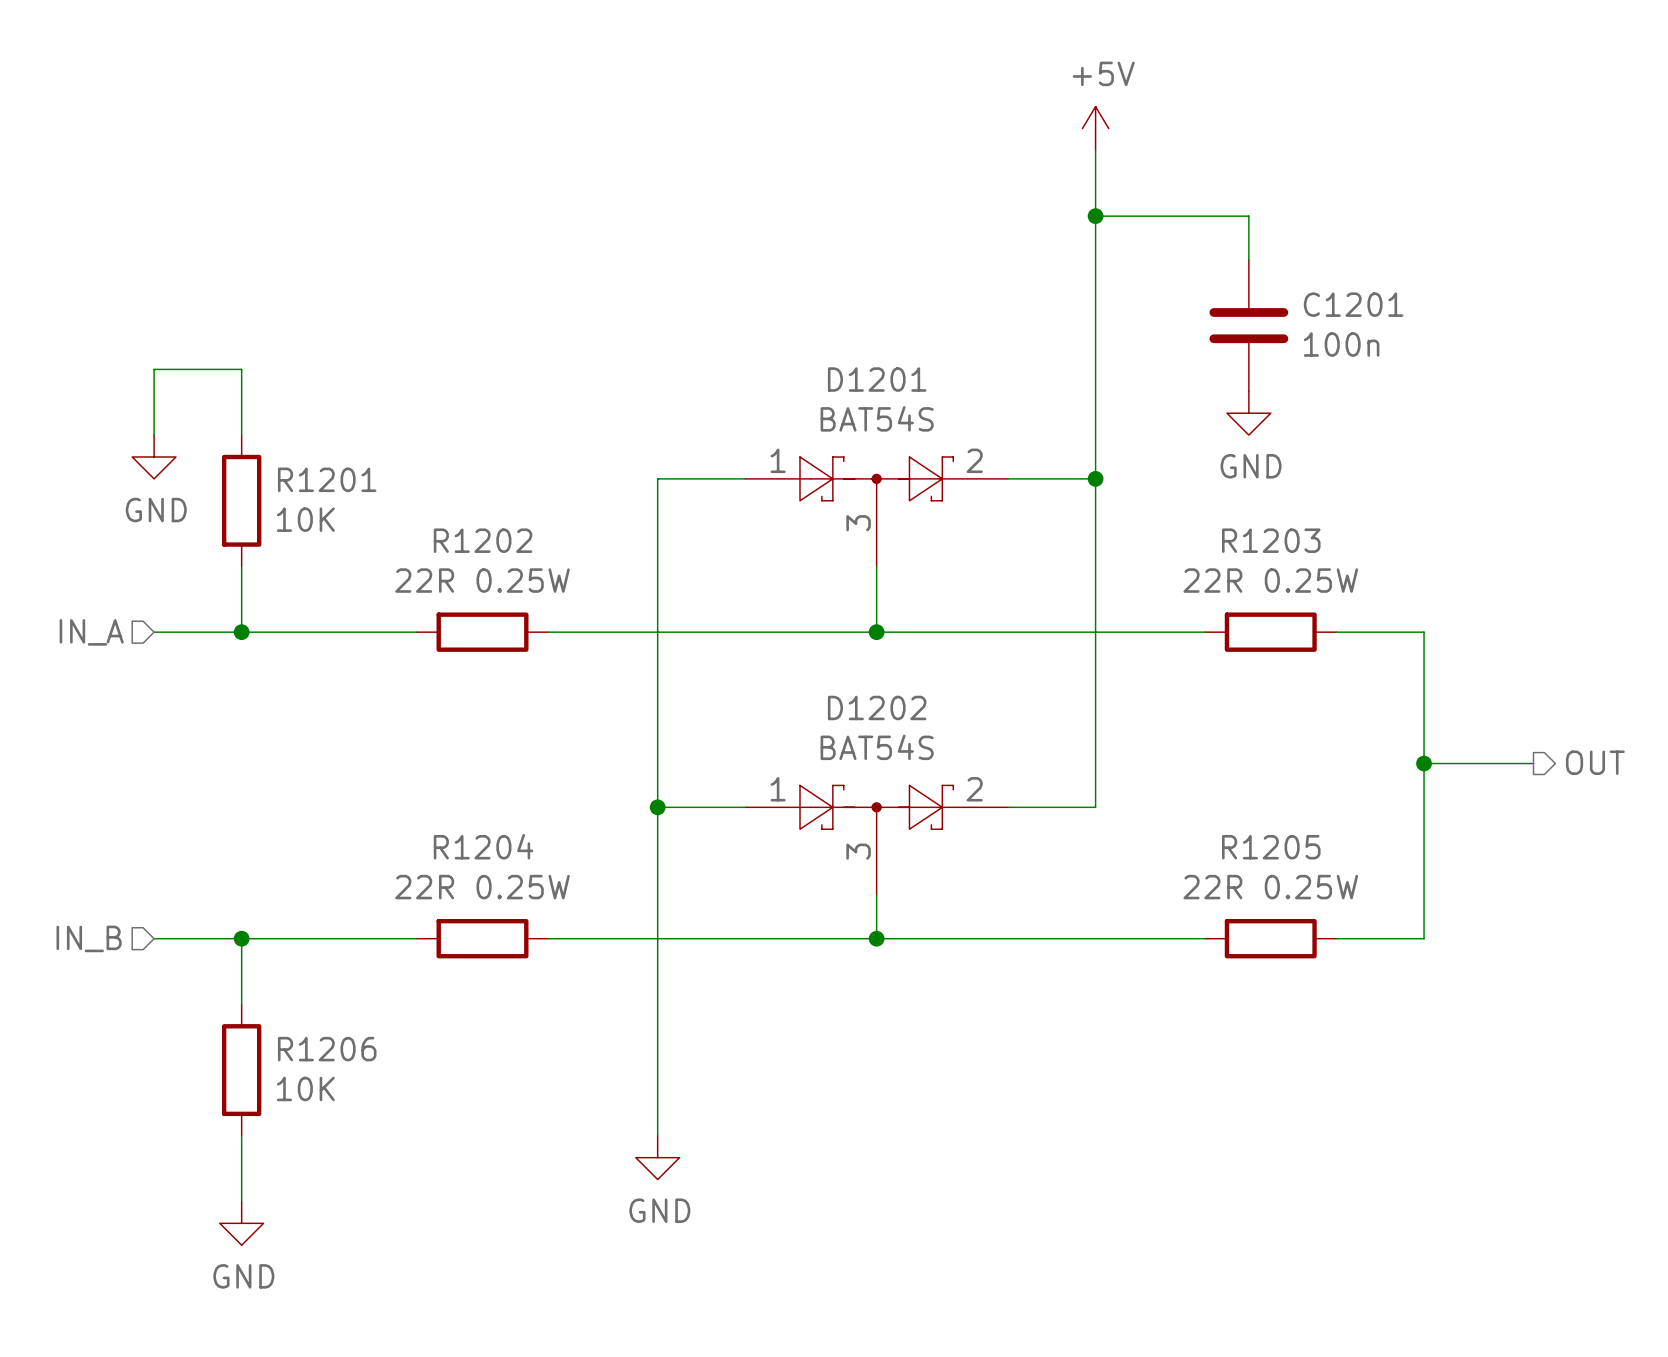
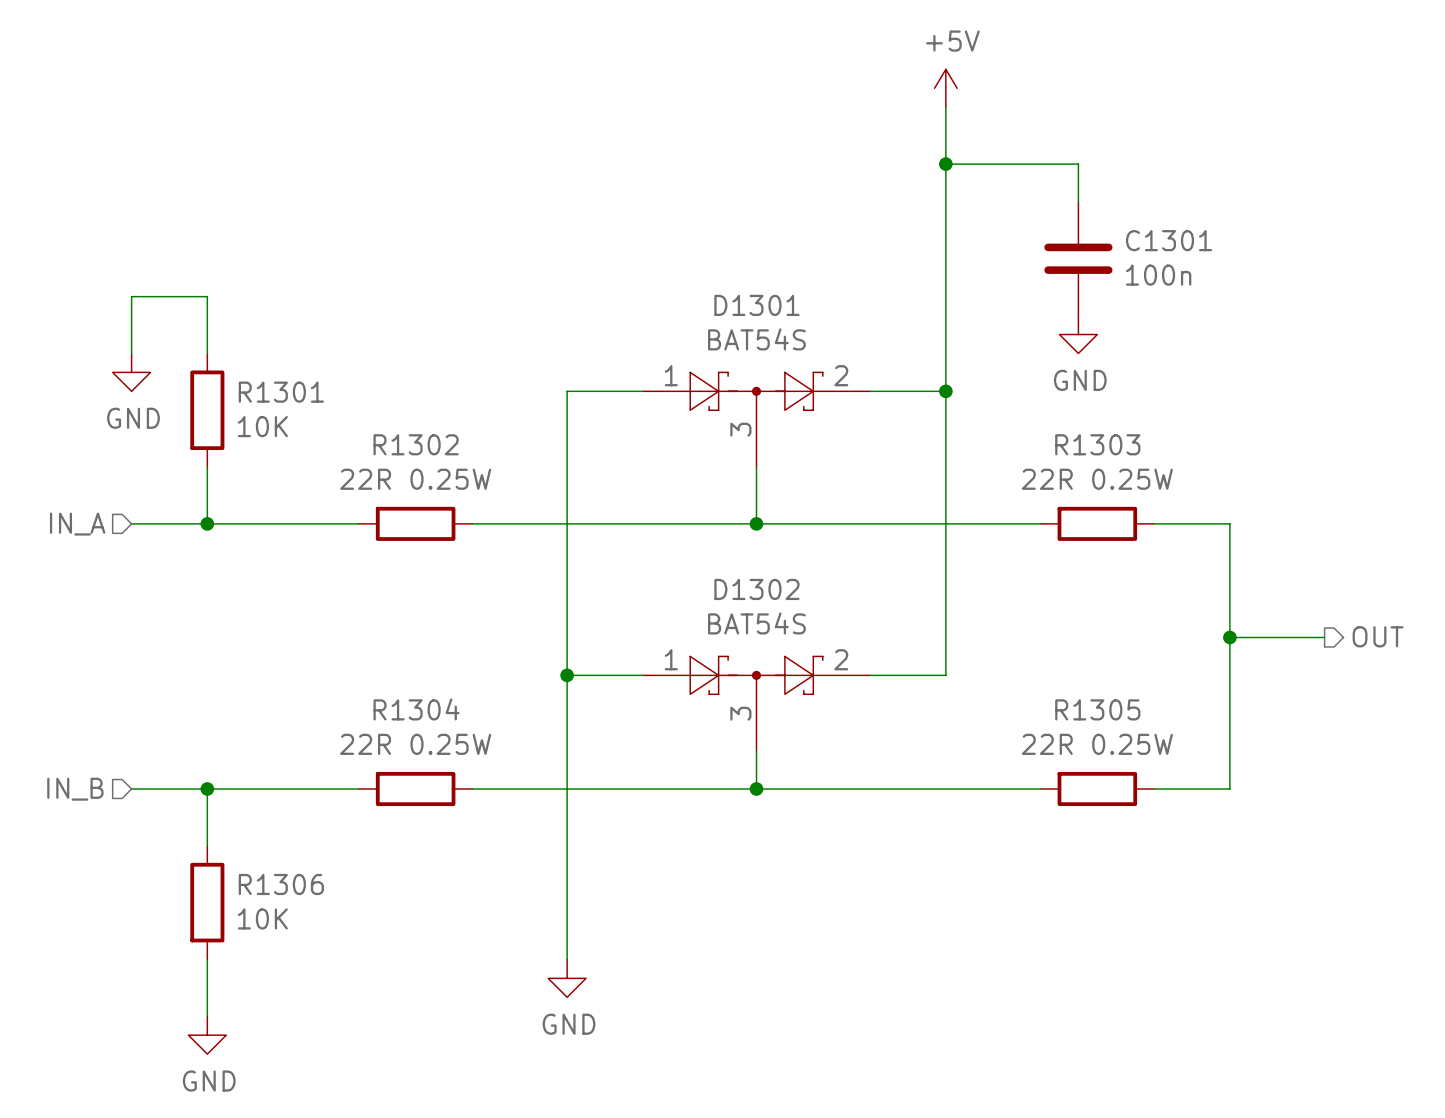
C1201 name: C1201 (1353, 304) -> C1301 (1169, 240)
D1201 name: D1201 (877, 379) -> D1301 (756, 305)
R1201 name: R1201 (327, 479) -> R1301 (281, 392)
R1202 name: R1202 (483, 540) -> R1302 (416, 444)
R1203 name: R1203 (1271, 540) -> R1303 (1097, 444)
D1202 name: D1202 (877, 707) -> D1302 (756, 589)
R1204 name: R1204 (483, 846) -> R1304 (416, 709)
R1205 name: R1205 (1271, 847) -> R1305 (1097, 709)
R1206 name: R1206 (327, 1049) -> R1306 (281, 884)

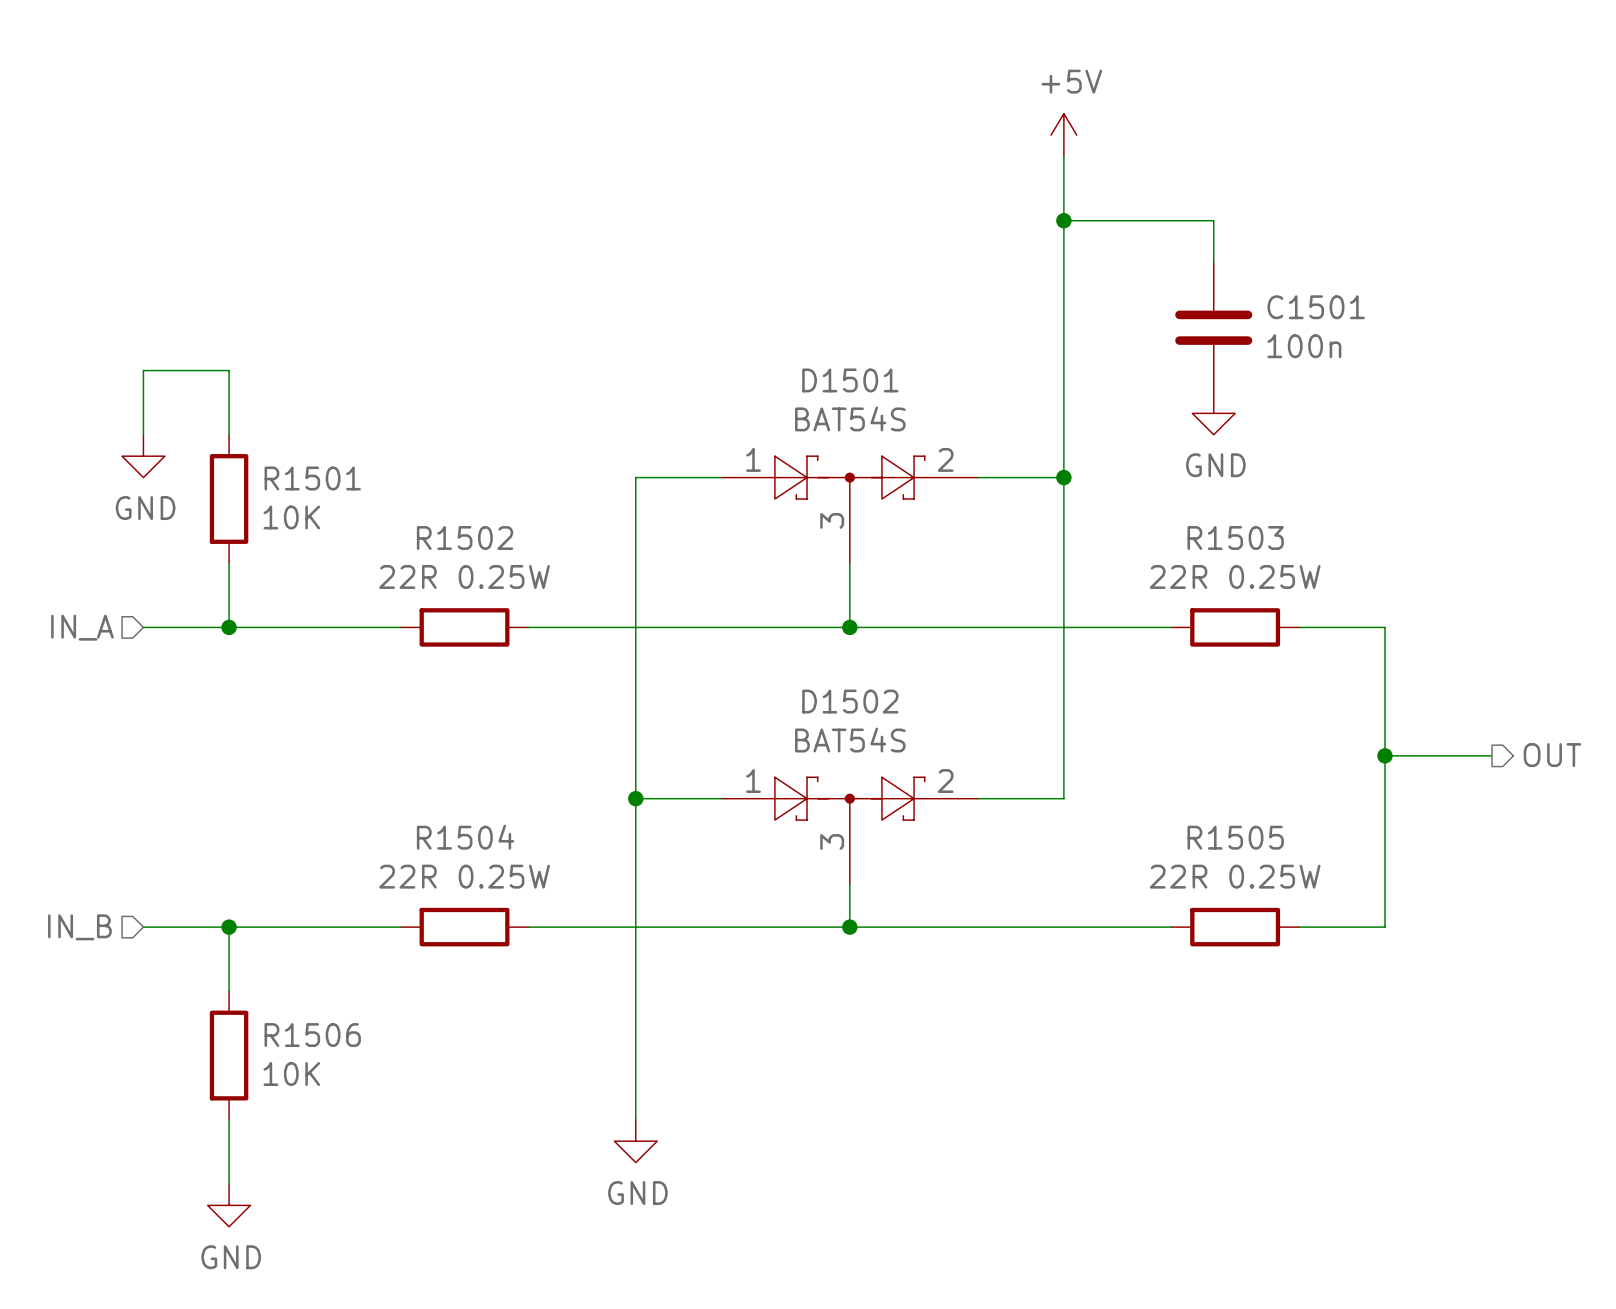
C1301 name: C1301 (1169, 240) -> C1501 (1316, 307)
D1301 name: D1301 (756, 305) -> D1501 (850, 380)
R1301 name: R1301 (281, 392) -> R1501 (312, 478)
R1302 name: R1302 (416, 444) -> R1502 (465, 538)
R1303 name: R1303 (1097, 444) -> R1503 (1235, 538)
D1302 name: D1302 (756, 589) -> D1502 (850, 701)
R1304 name: R1304 (416, 709) -> R1504 (465, 837)
R1305 name: R1305 (1097, 709) -> R1505 (1235, 837)
R1306 name: R1306 (281, 884) -> R1506 (312, 1035)

